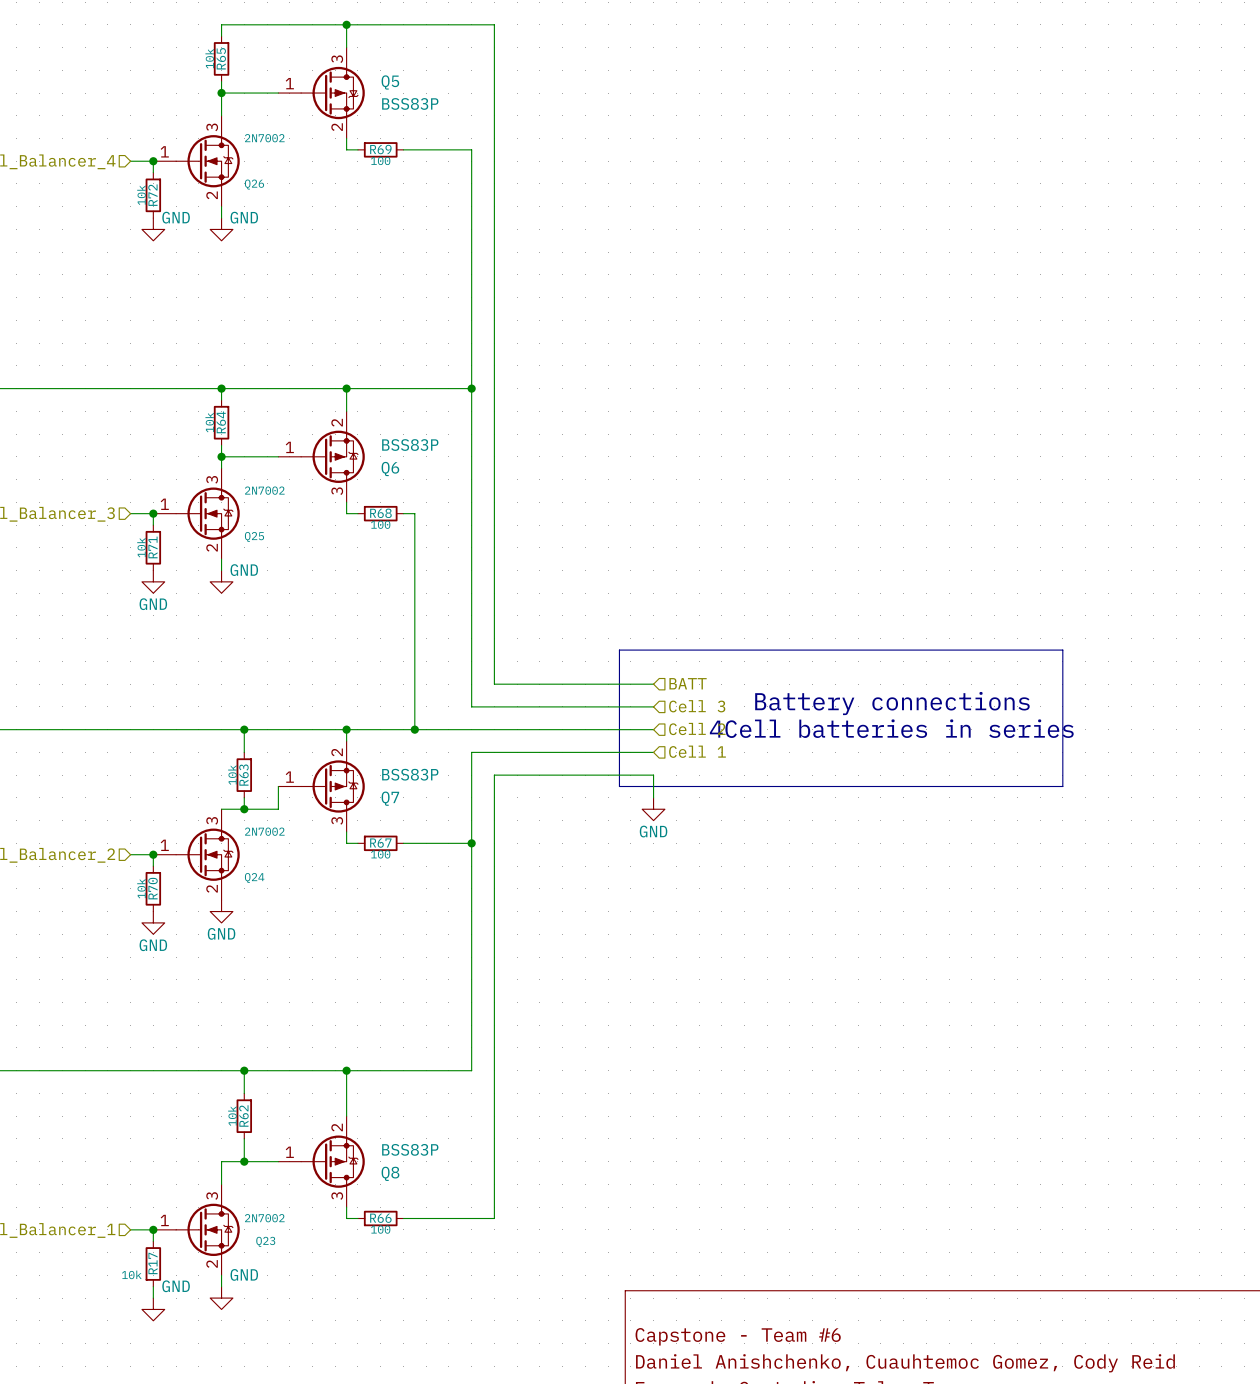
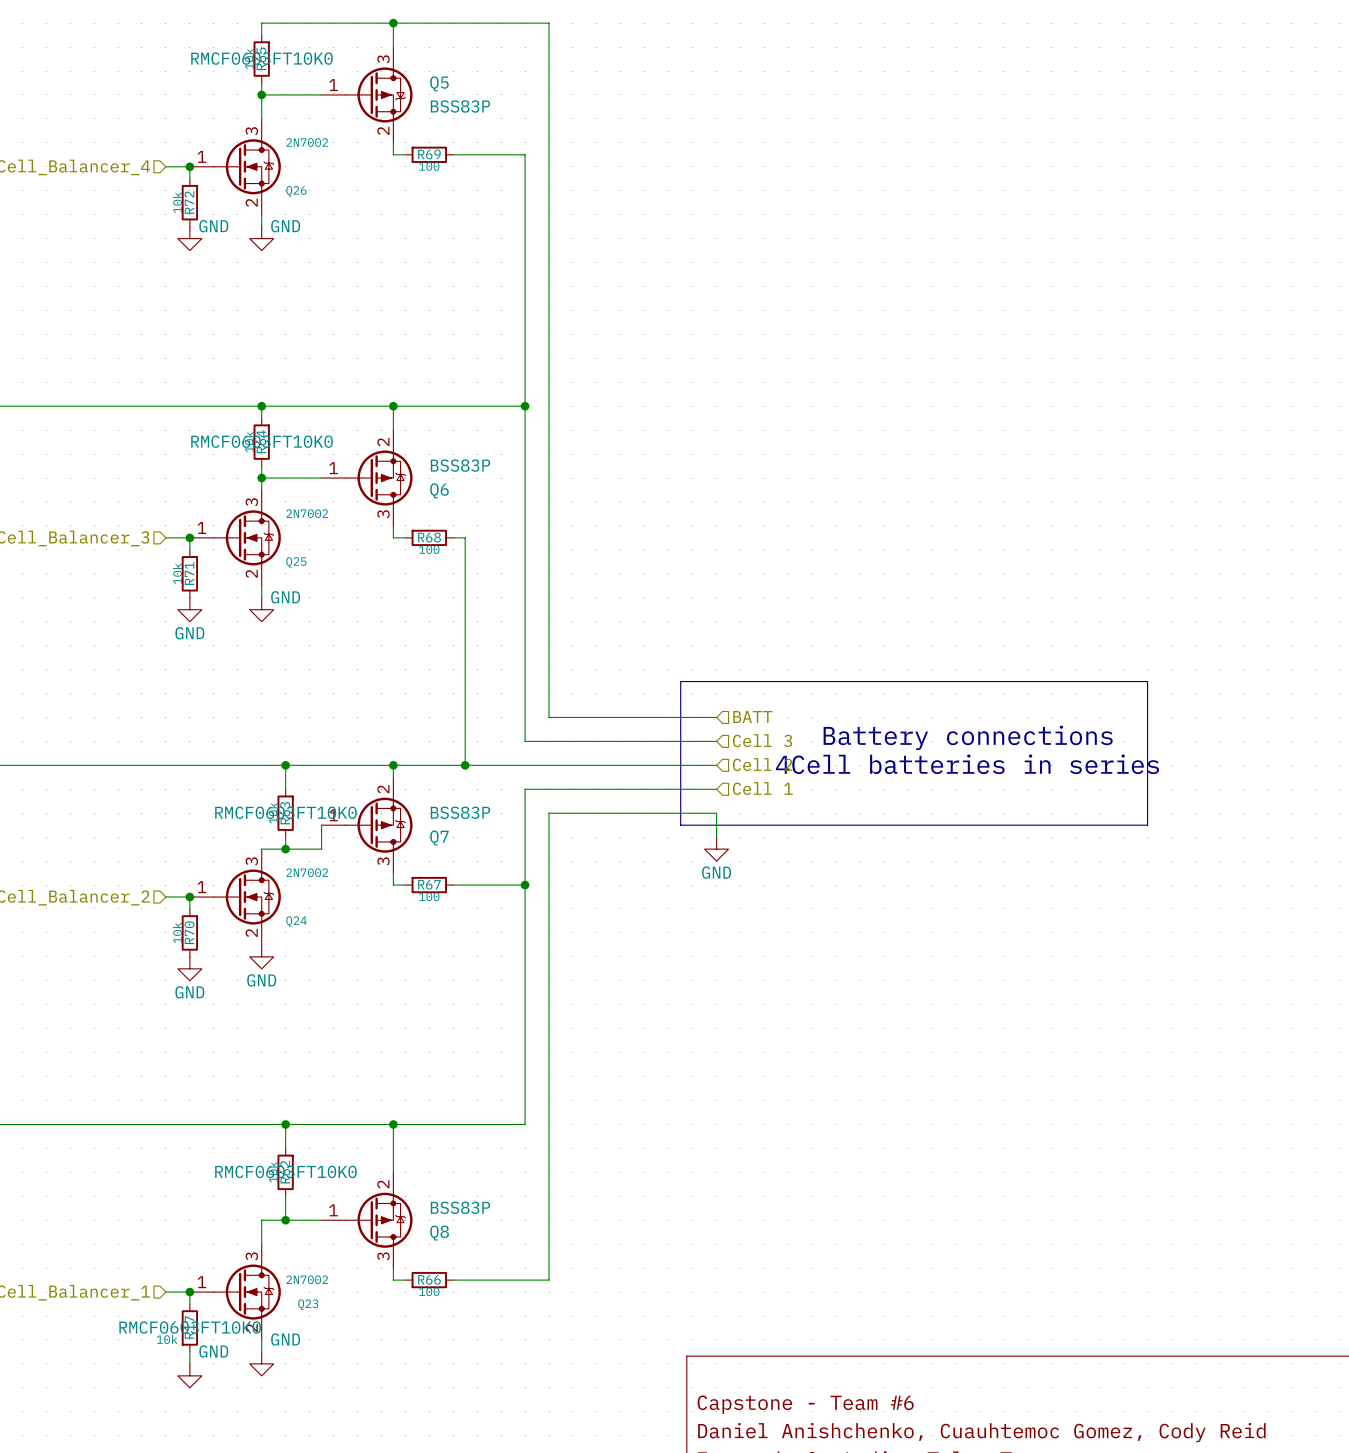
R65 text: none -> RMCF0603FT10K0 (261, 58)
R64 text: none -> RMCF0603FT10K0 (261, 441)
R63 text: none -> RMCF0603FT10K0 (285, 812)
R62 text: none -> RMCF0603FT10K0 (285, 1171)
R17 text: none -> RMCF0603FT10K0 (190, 1327)

